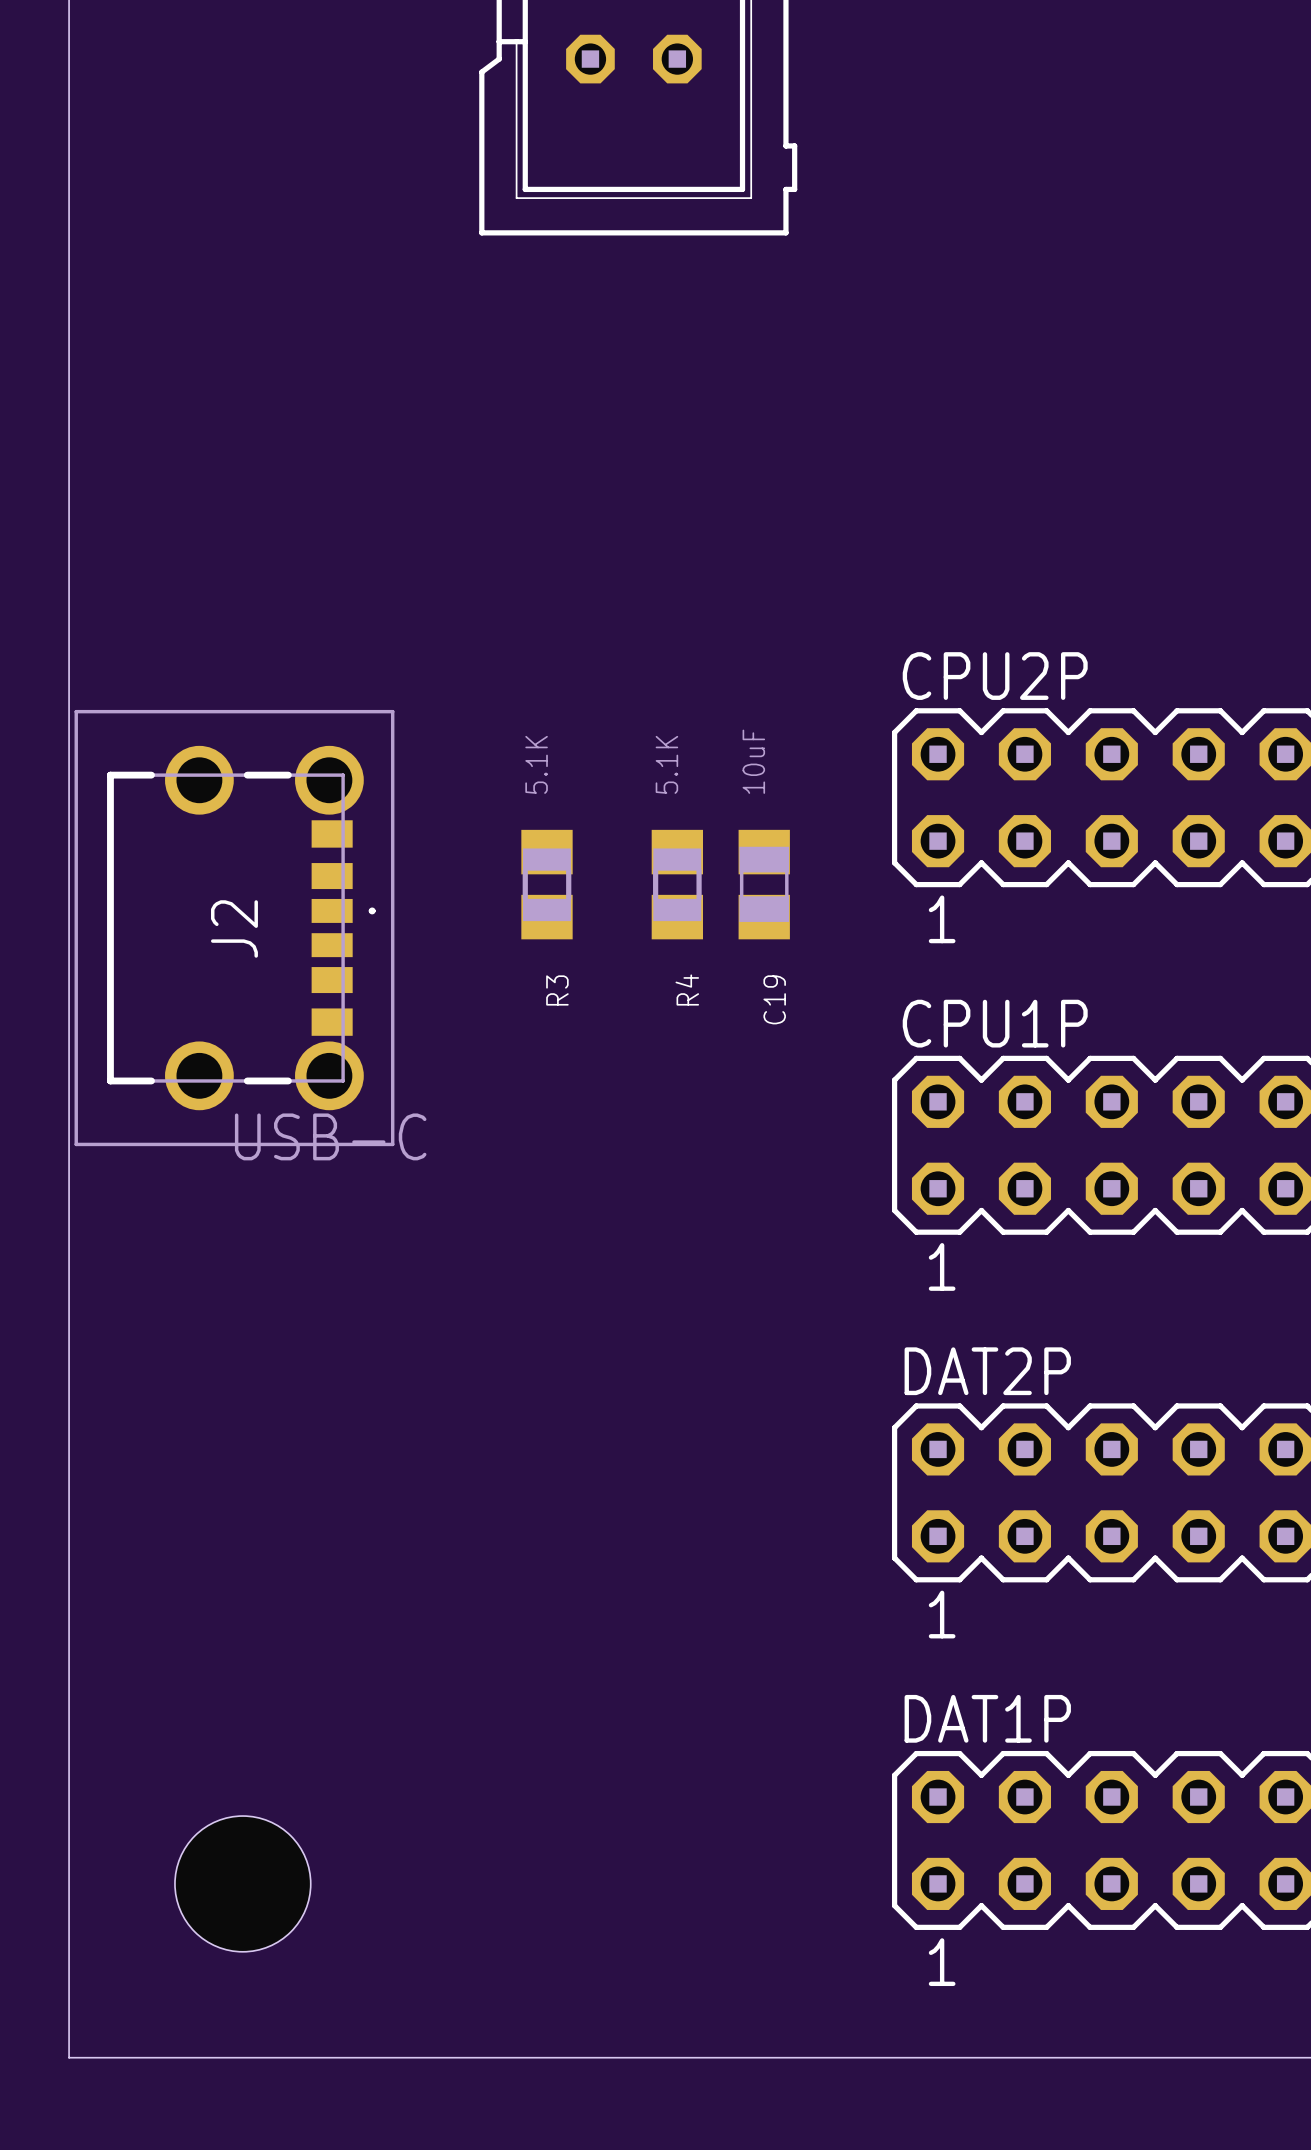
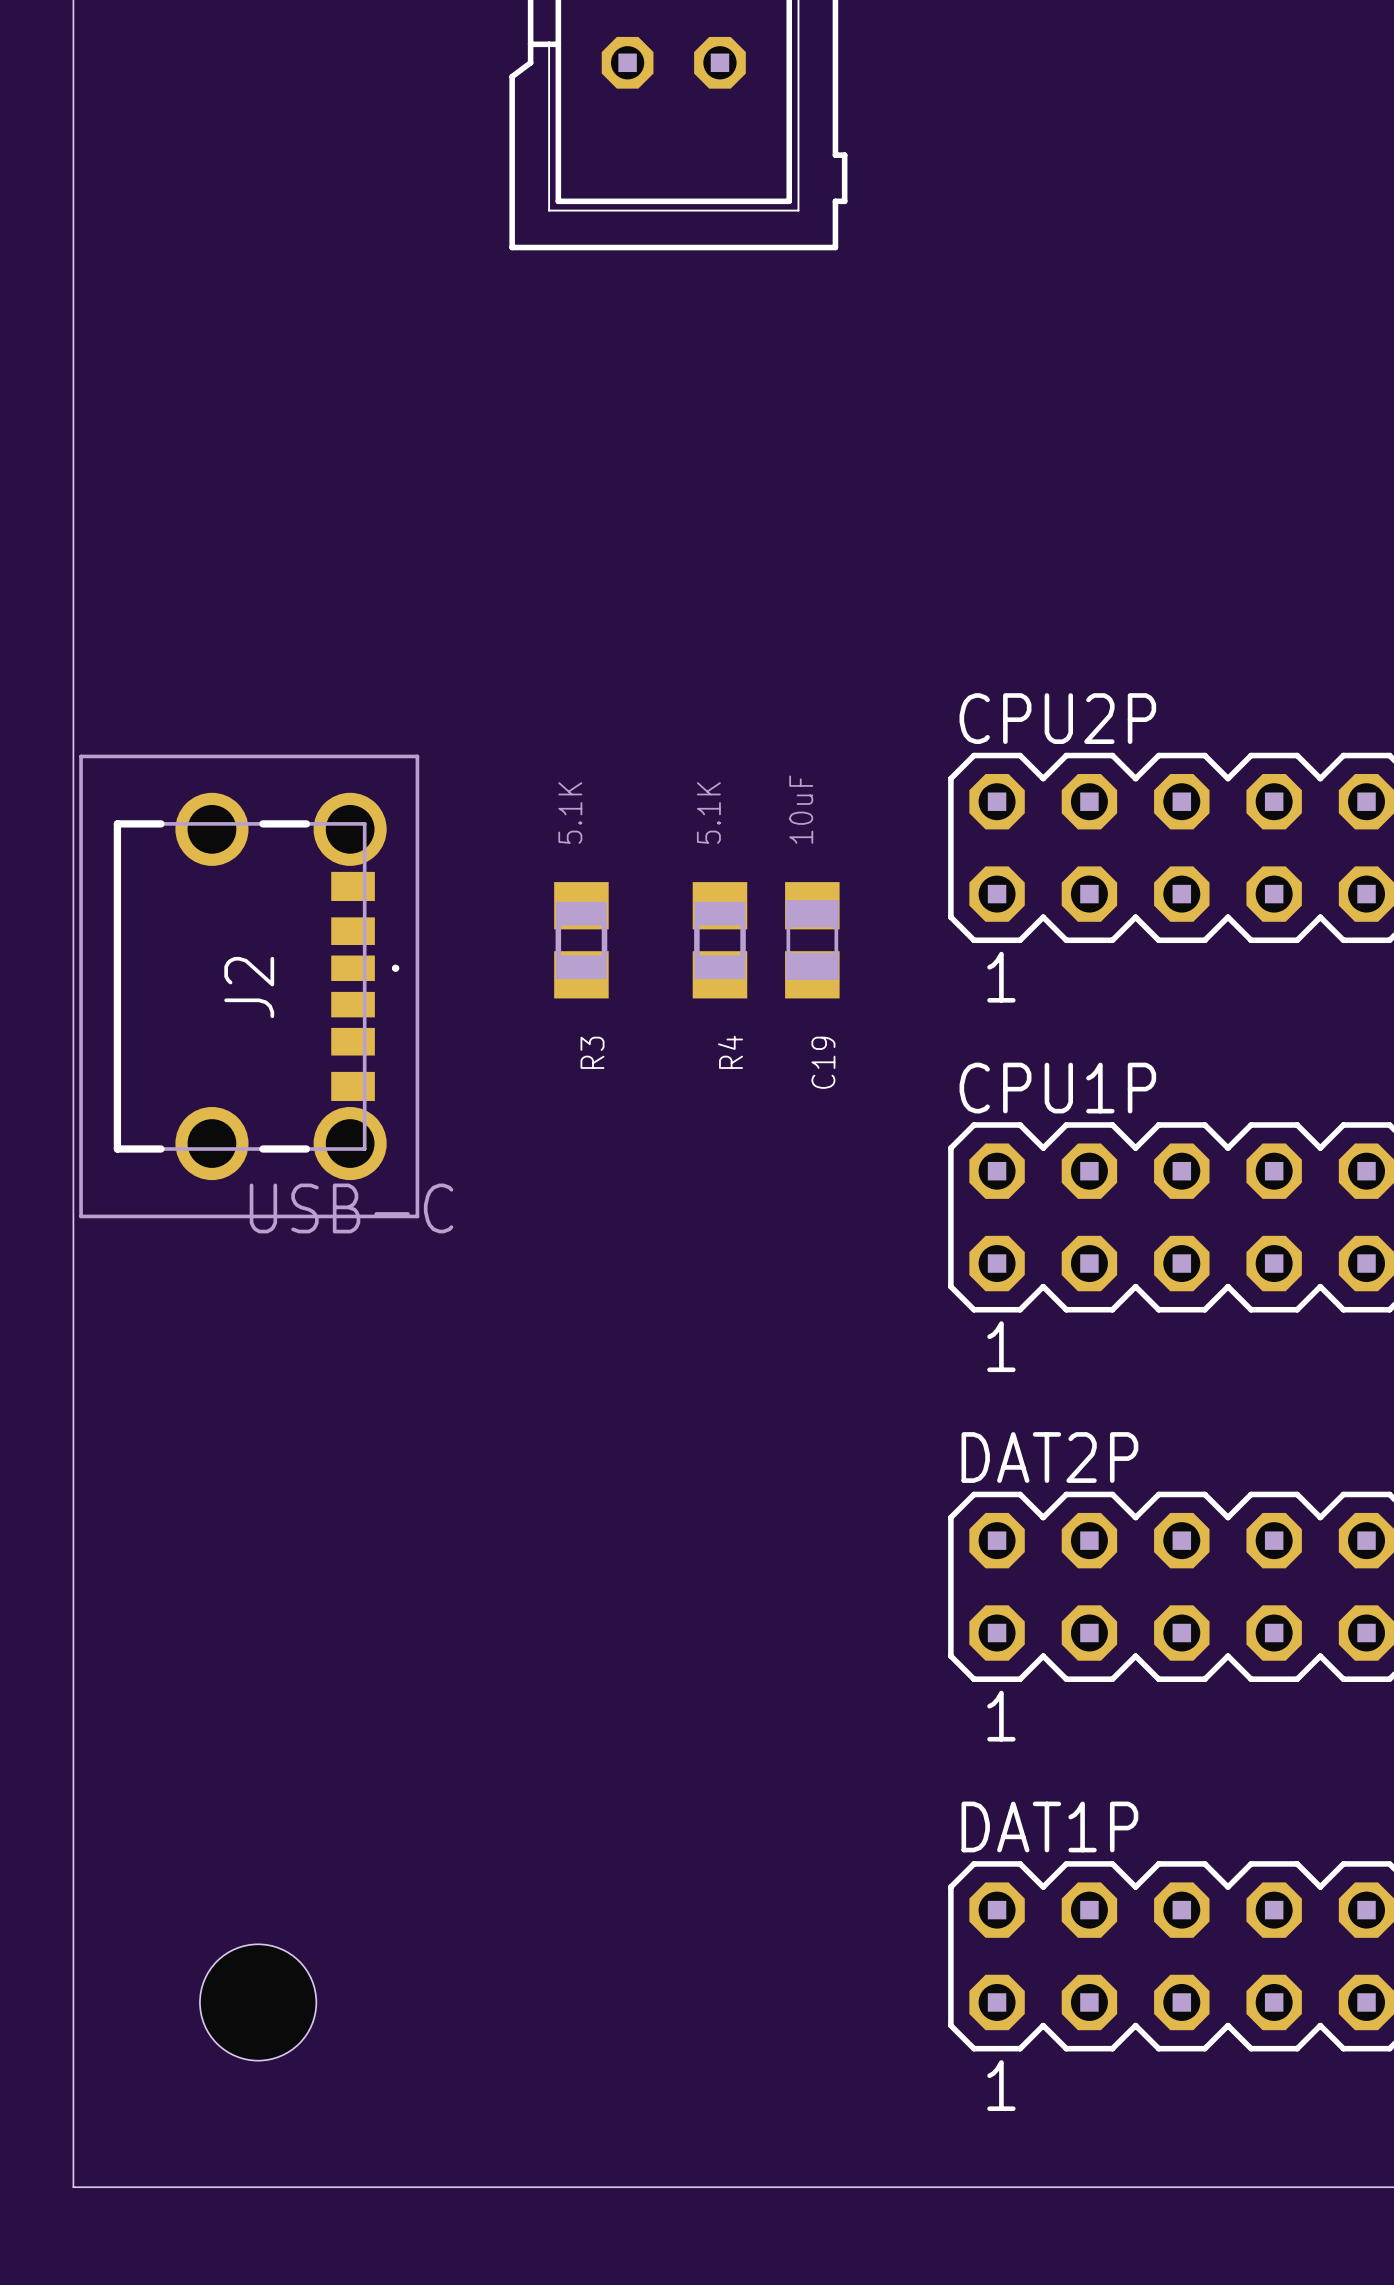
hole size: [174, 1816, 311, 1952] -> [199, 1944, 317, 2061]

